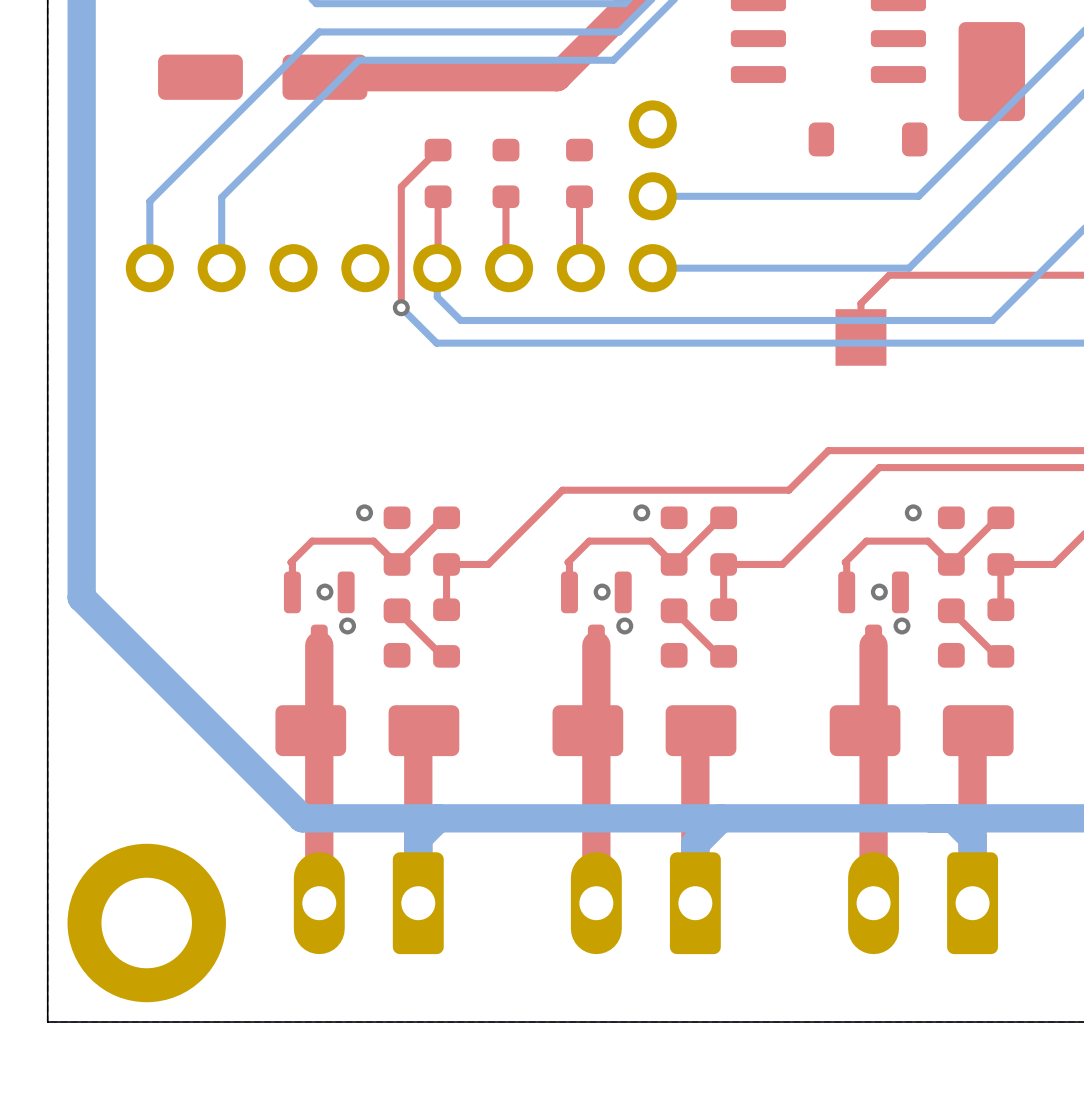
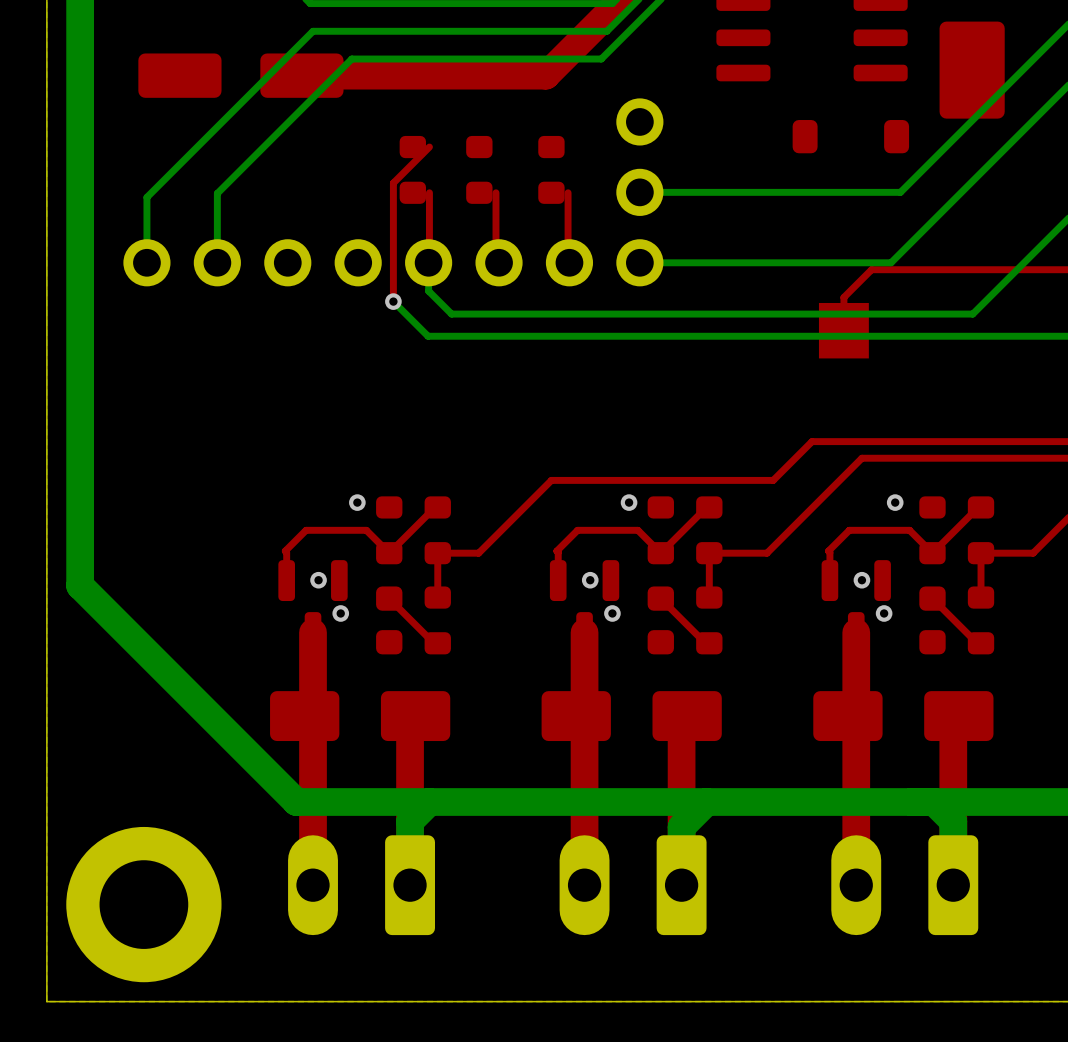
part position: (262, 77) -> (240, 75)
part position: (438, 173) -> (412, 169)
part position: (505, 173) -> (479, 169)
part position: (579, 173) -> (551, 169)

